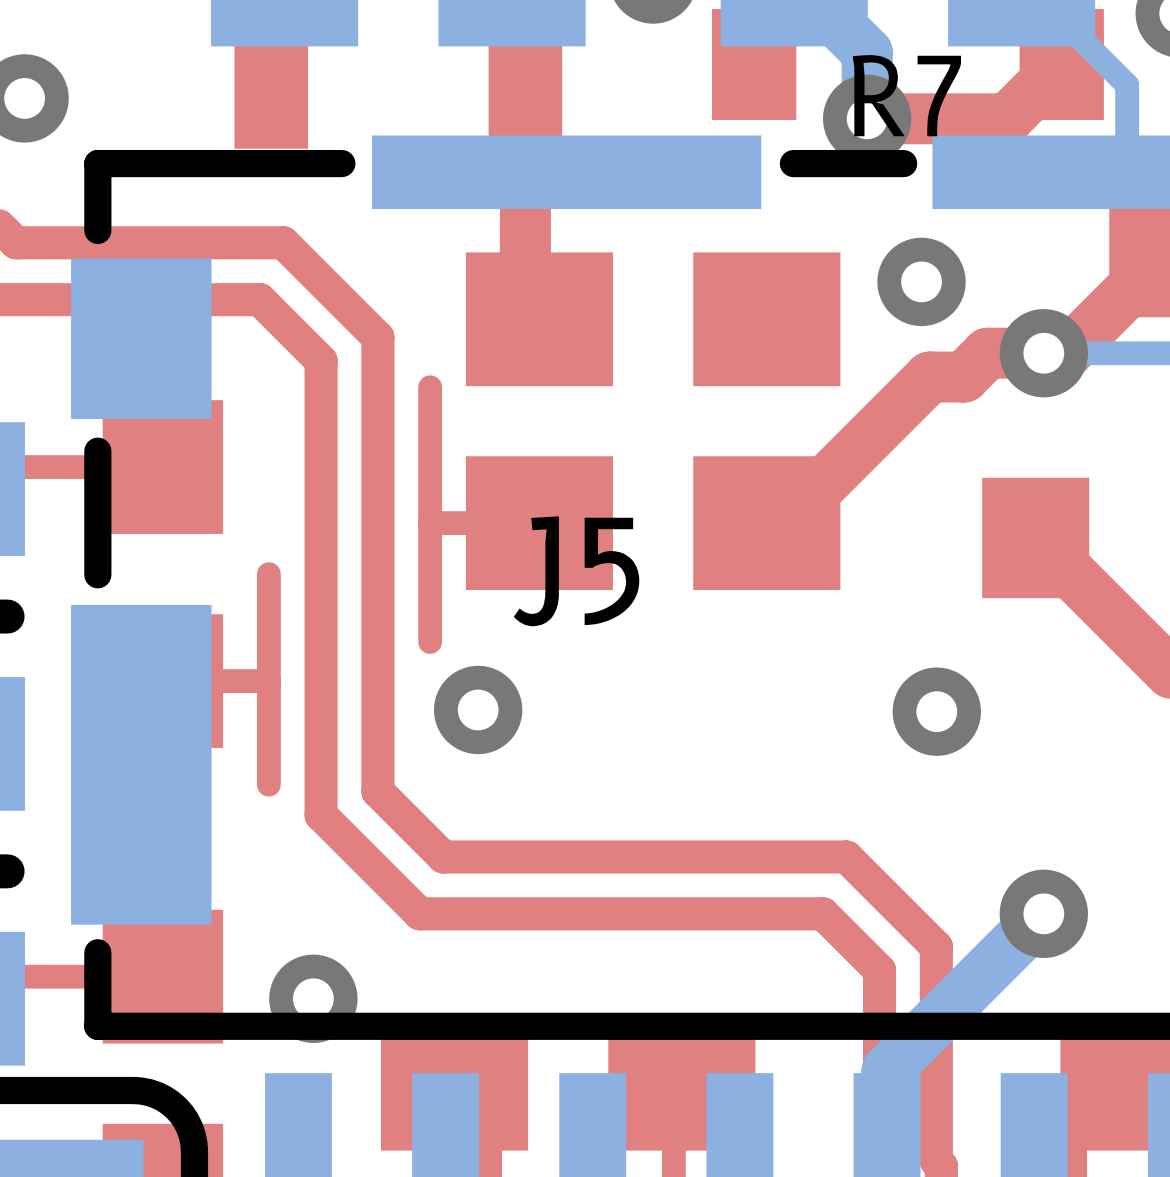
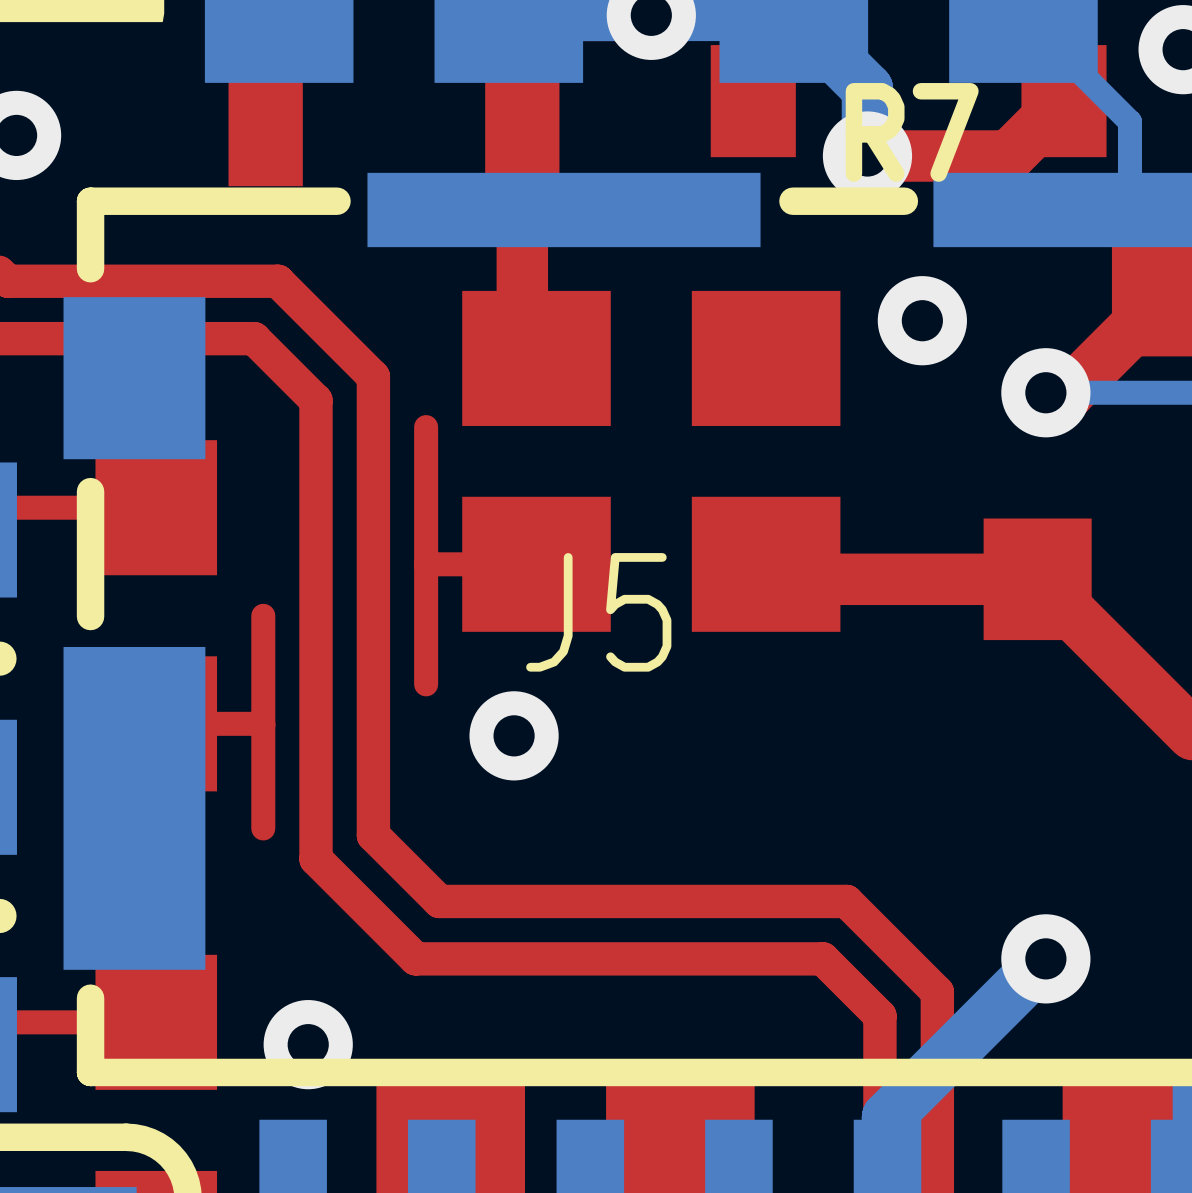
top track: (1043, 353) (987, 353) (963, 377) (929, 377) (783, 523) (766, 523) -> (1037, 579) (781, 579) (766, 564)
via position: (478, 709) -> (514, 735)
via: (936, 711) -> none

